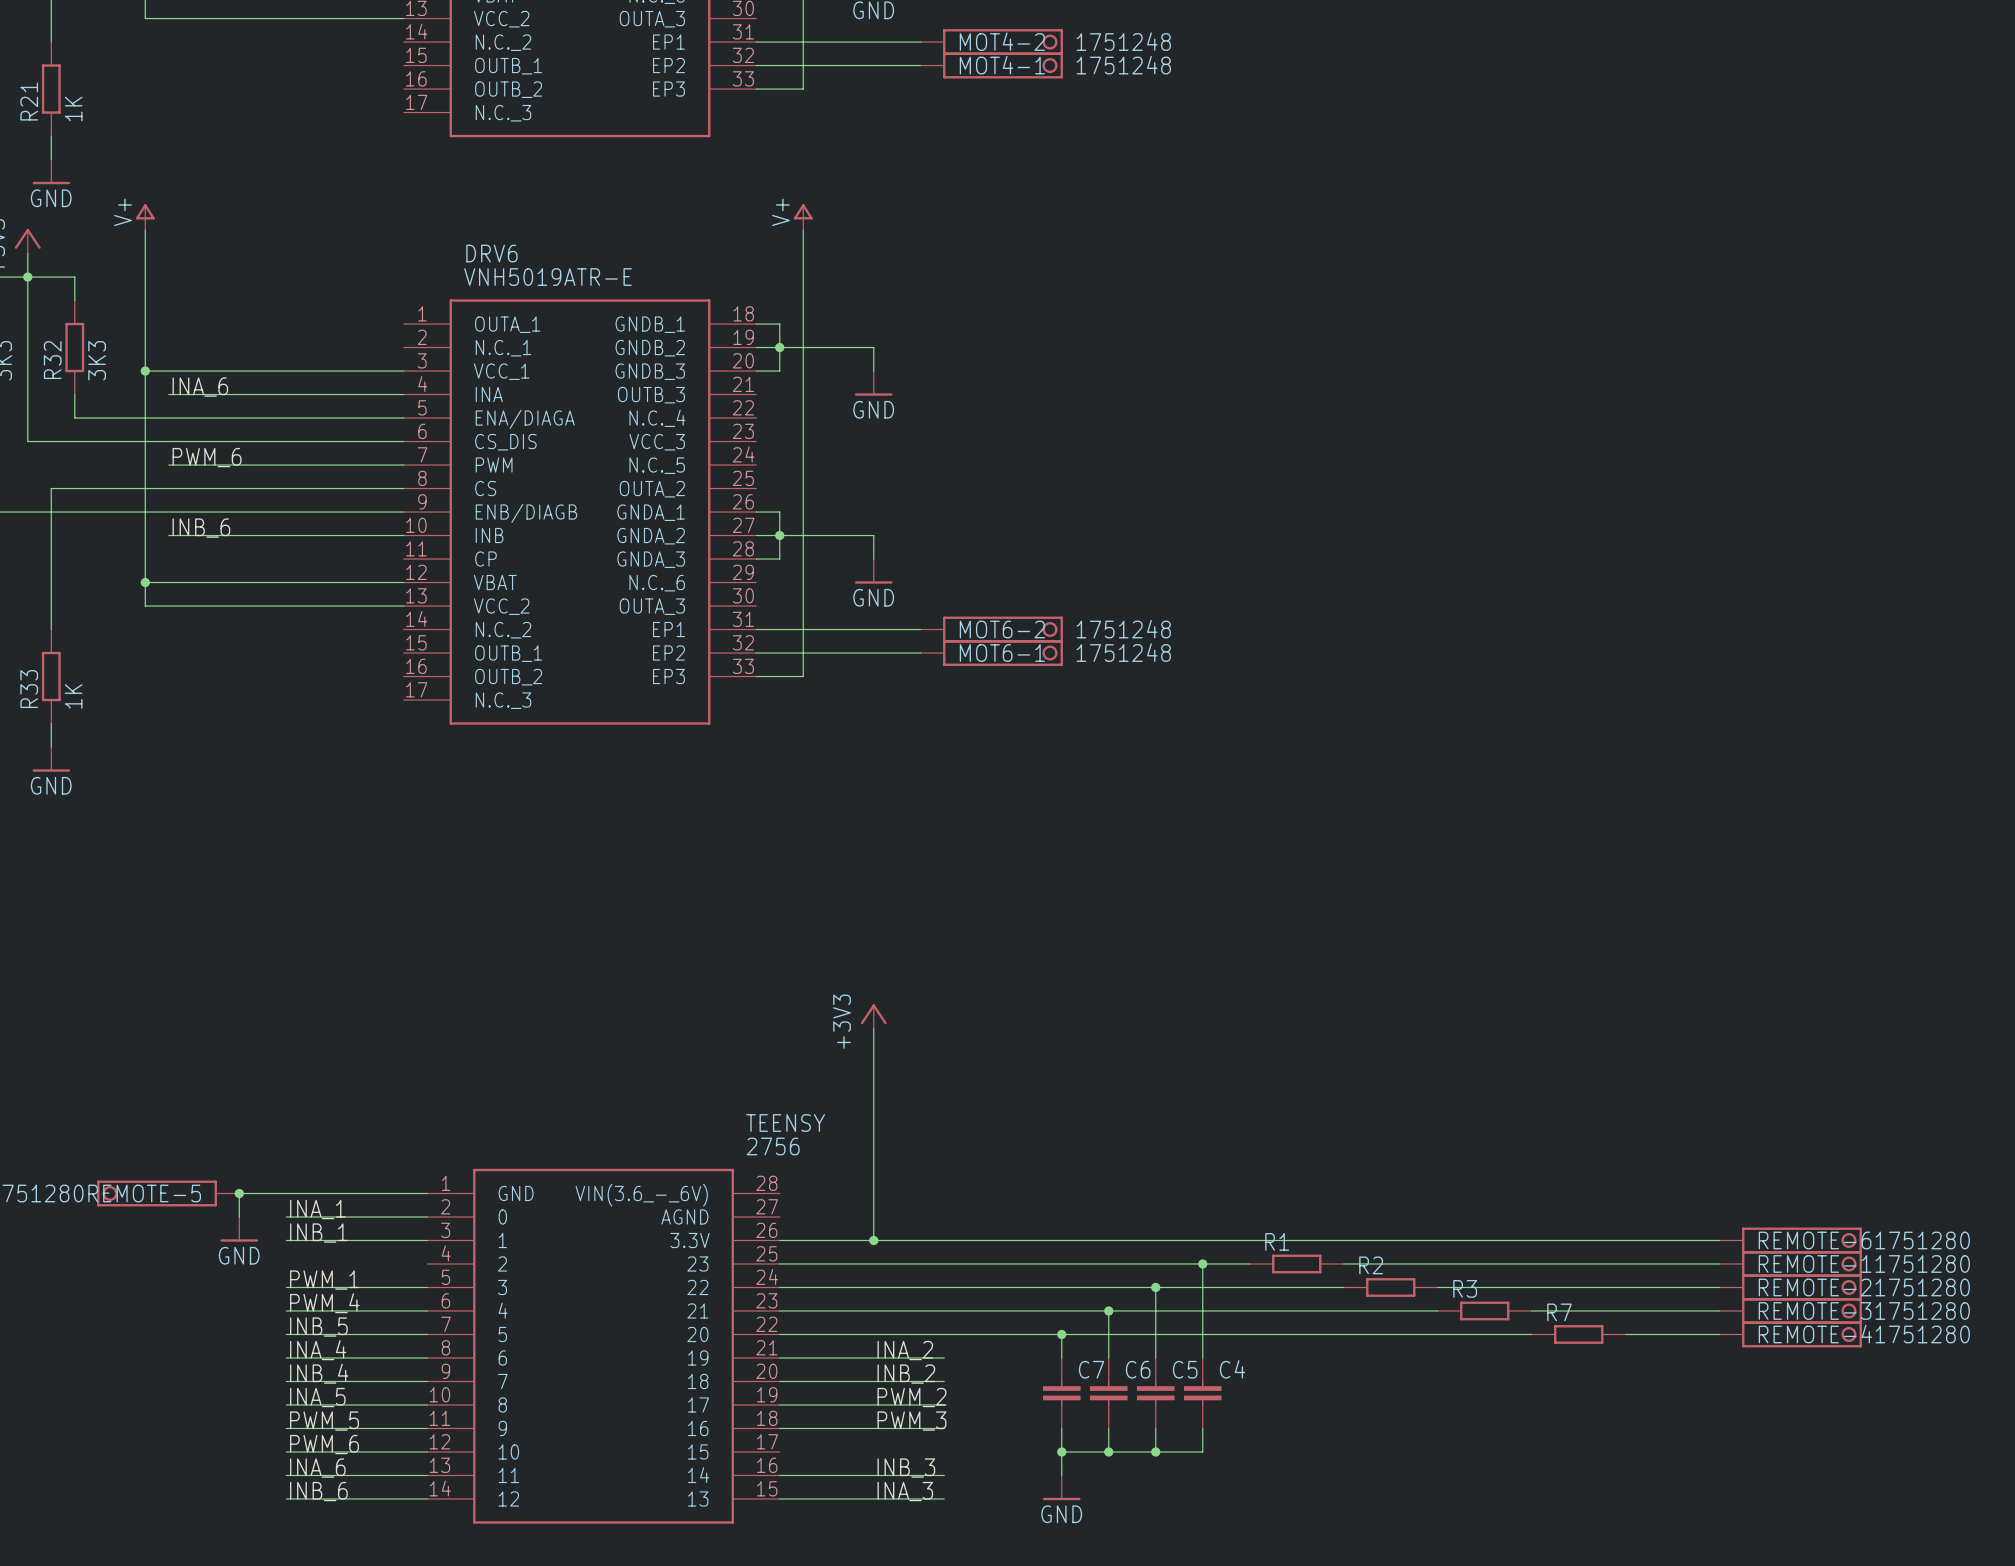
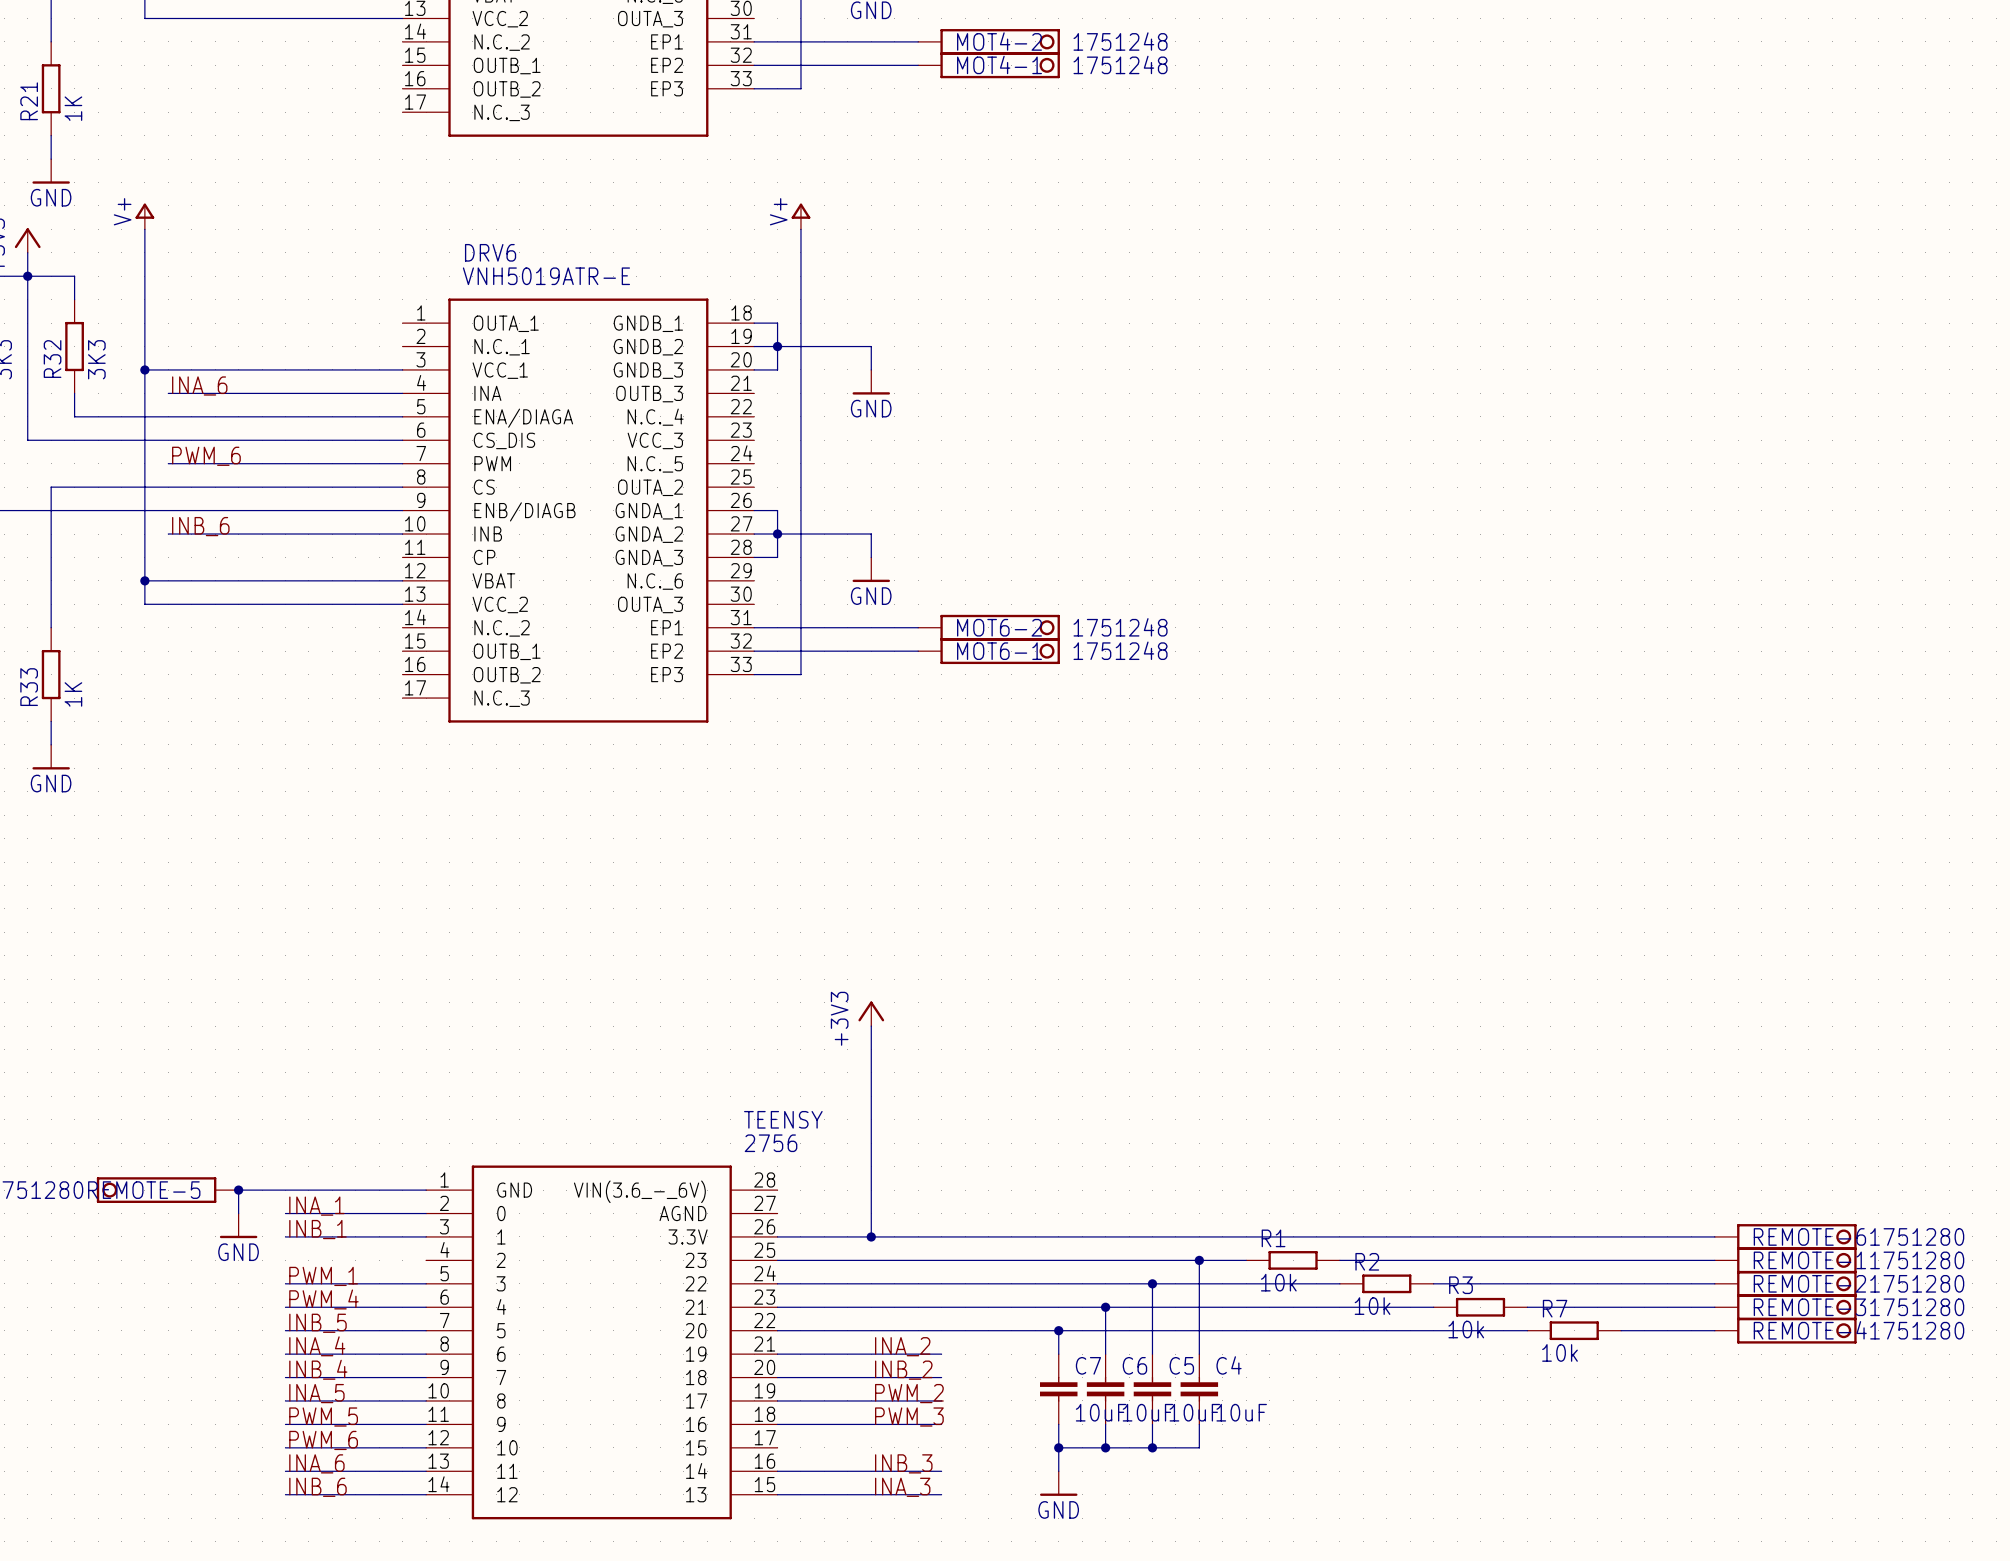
R1 value: none -> 10k (1278, 1282)
R2 value: none -> 10k (1372, 1306)
R3 value: none -> 10k (1466, 1329)
R7 value: none -> 10k (1560, 1352)
C7 value: none -> 10uF (1101, 1412)
C6 value: none -> 10uF (1147, 1412)
C5 value: none -> 10uF (1194, 1412)
C4 value: none -> 10uF (1241, 1412)

